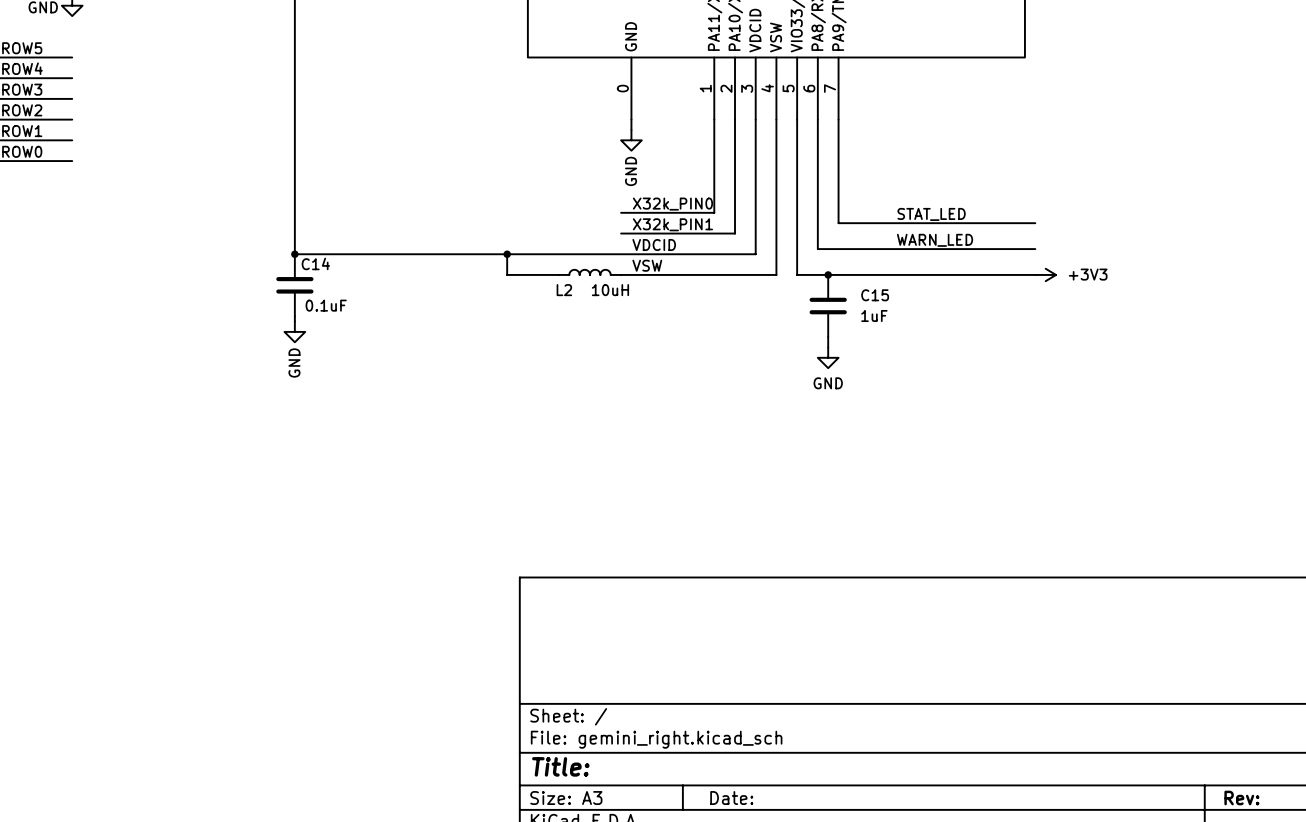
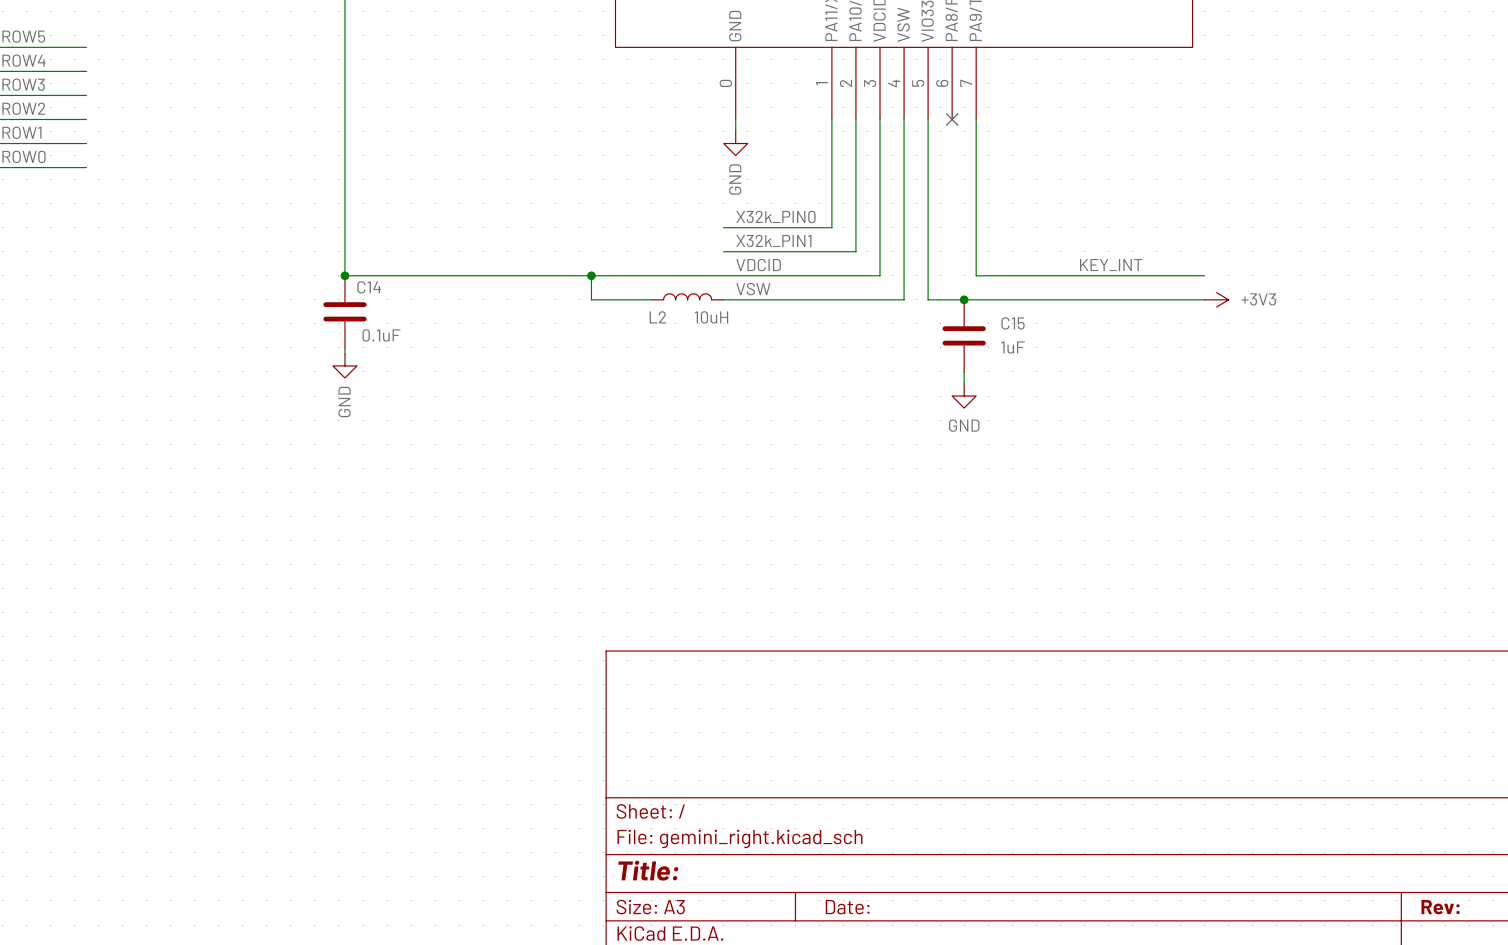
wire: (817, 119) (817, 249) (1035, 249) -> none
no-connect mark: none -> (952, 119)
label: STAT_LED (931, 214) -> none
wire: (838, 223) (1035, 223) -> (976, 239) (976, 275) (1204, 275)
label: WARN_LED (935, 240) -> none
label: none -> KEY_INT (1111, 265)

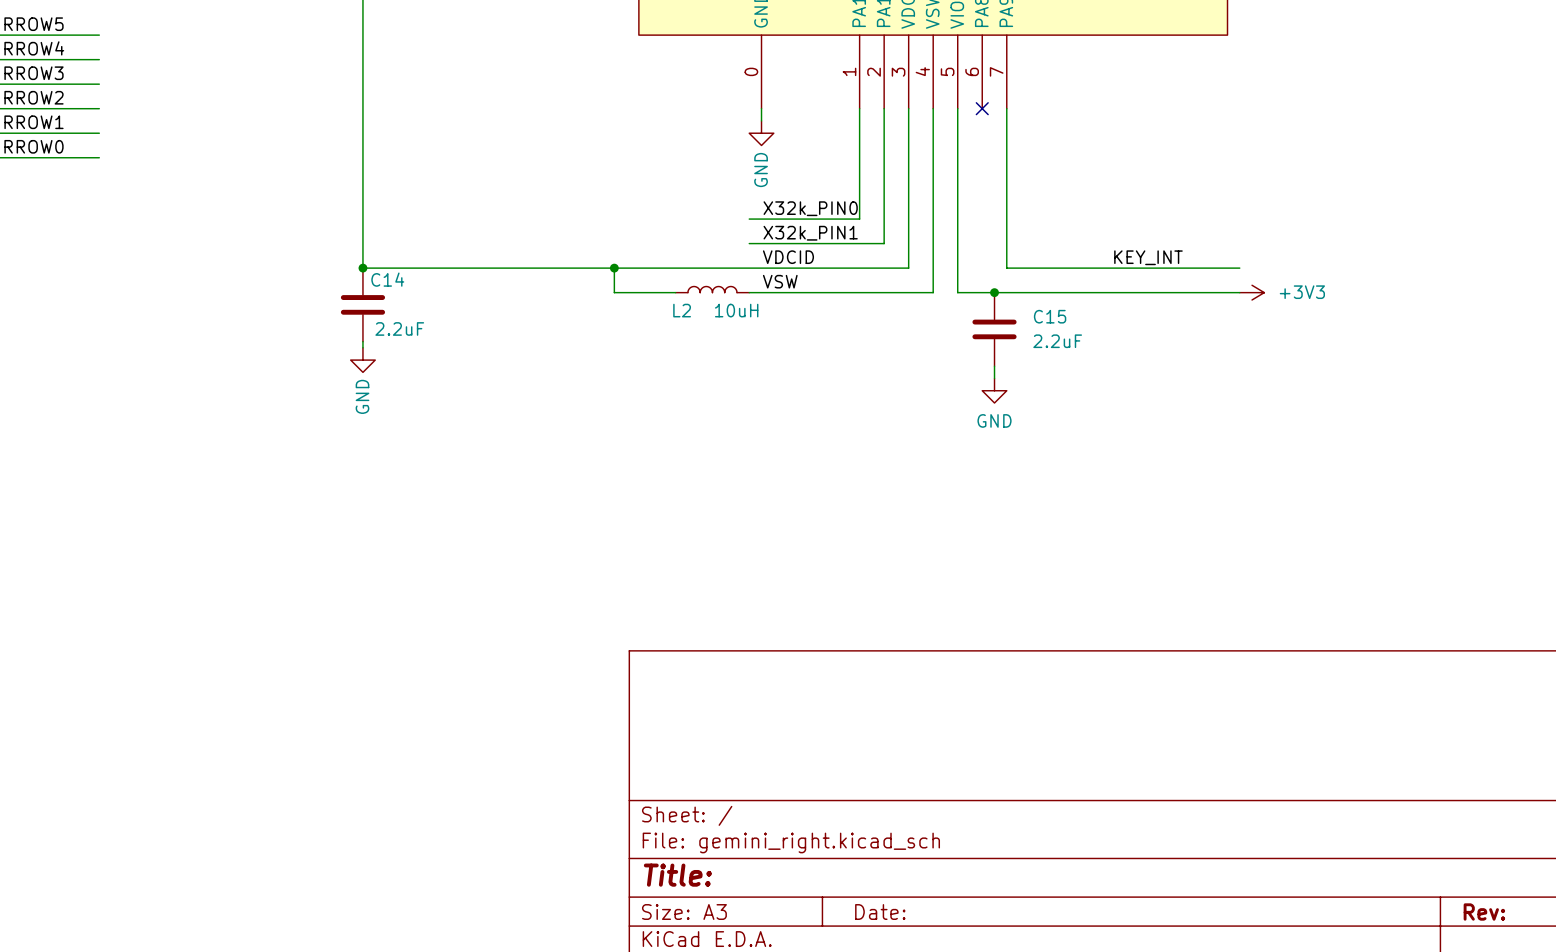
C14 value: 0.1uF (381, 335) -> 2.2uF (399, 328)
C15 value: 1uF (1013, 347) -> 2.2uF (1057, 341)

